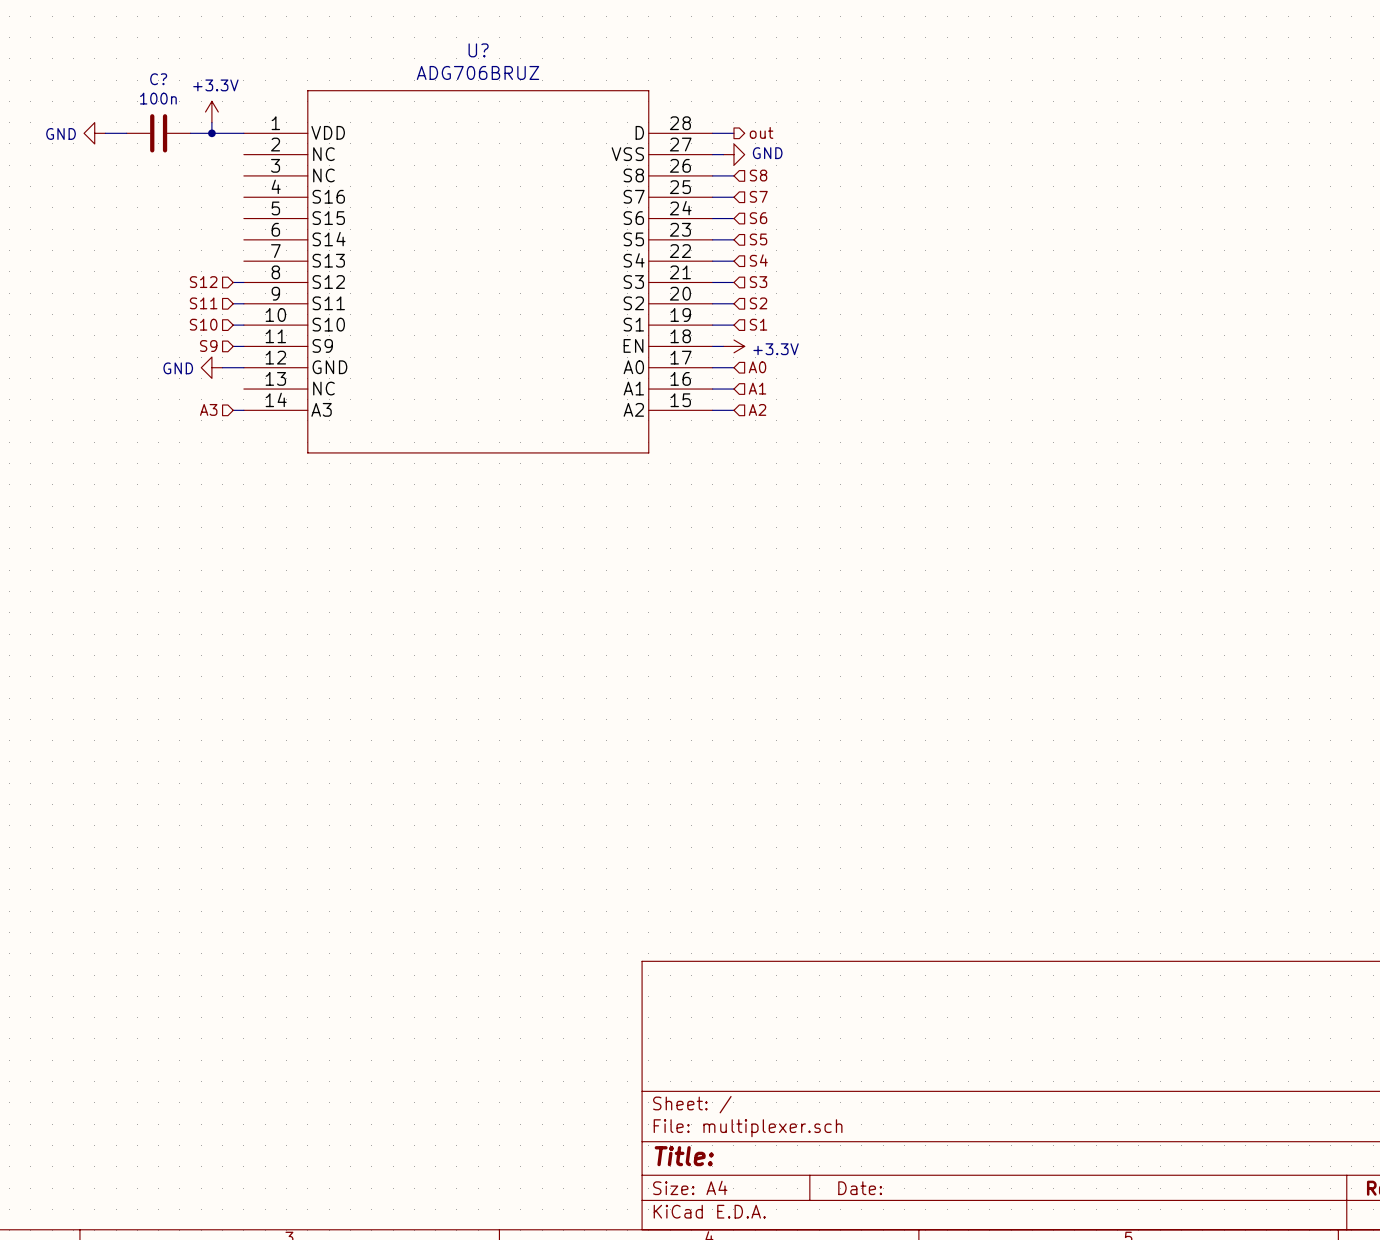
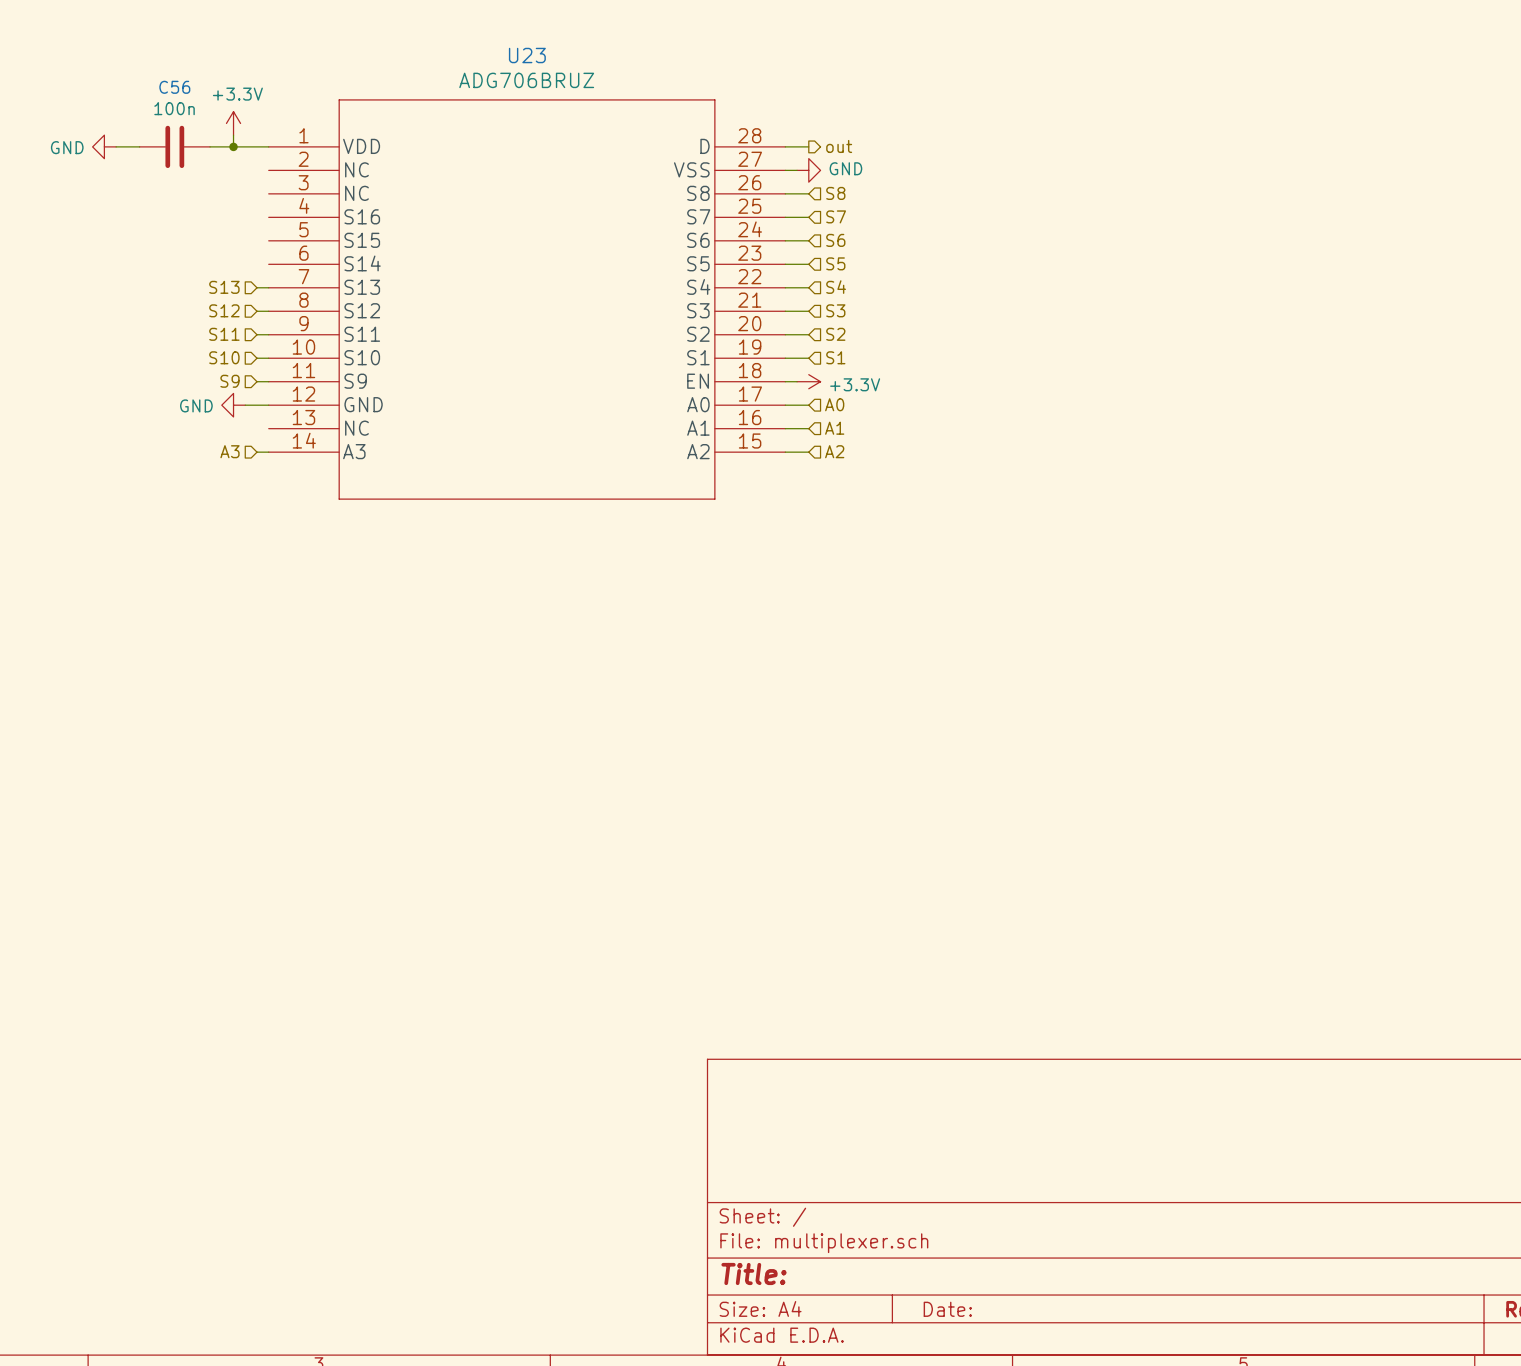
U? name: U? (478, 50) -> U23 (527, 55)
C? name: C? (158, 79) -> C56 (174, 87)
hierarchical label: none -> S13 (224, 287)
wire: none -> (257, 287) (268, 287)

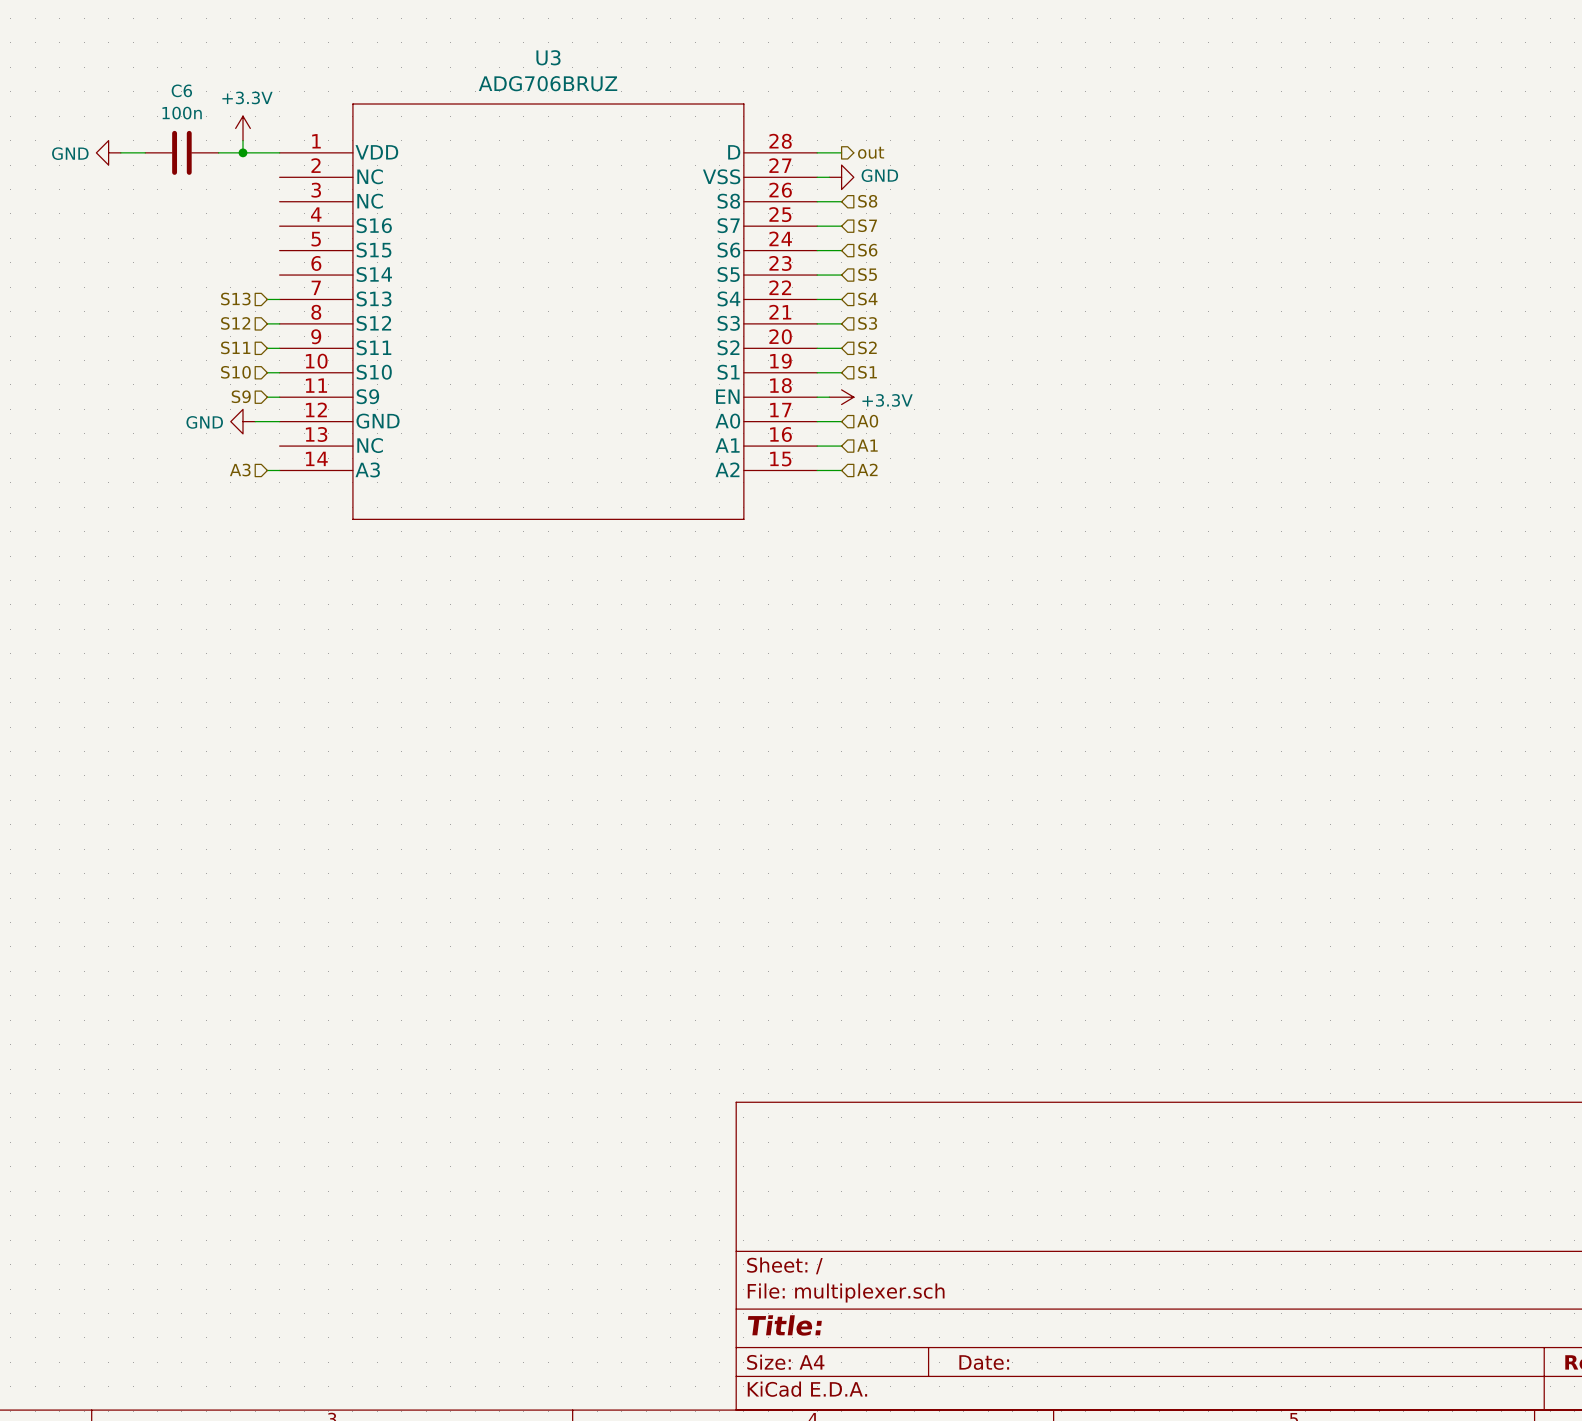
U23 name: U23 (527, 55) -> U3 (548, 57)
C56 name: C56 (174, 87) -> C6 (181, 90)

